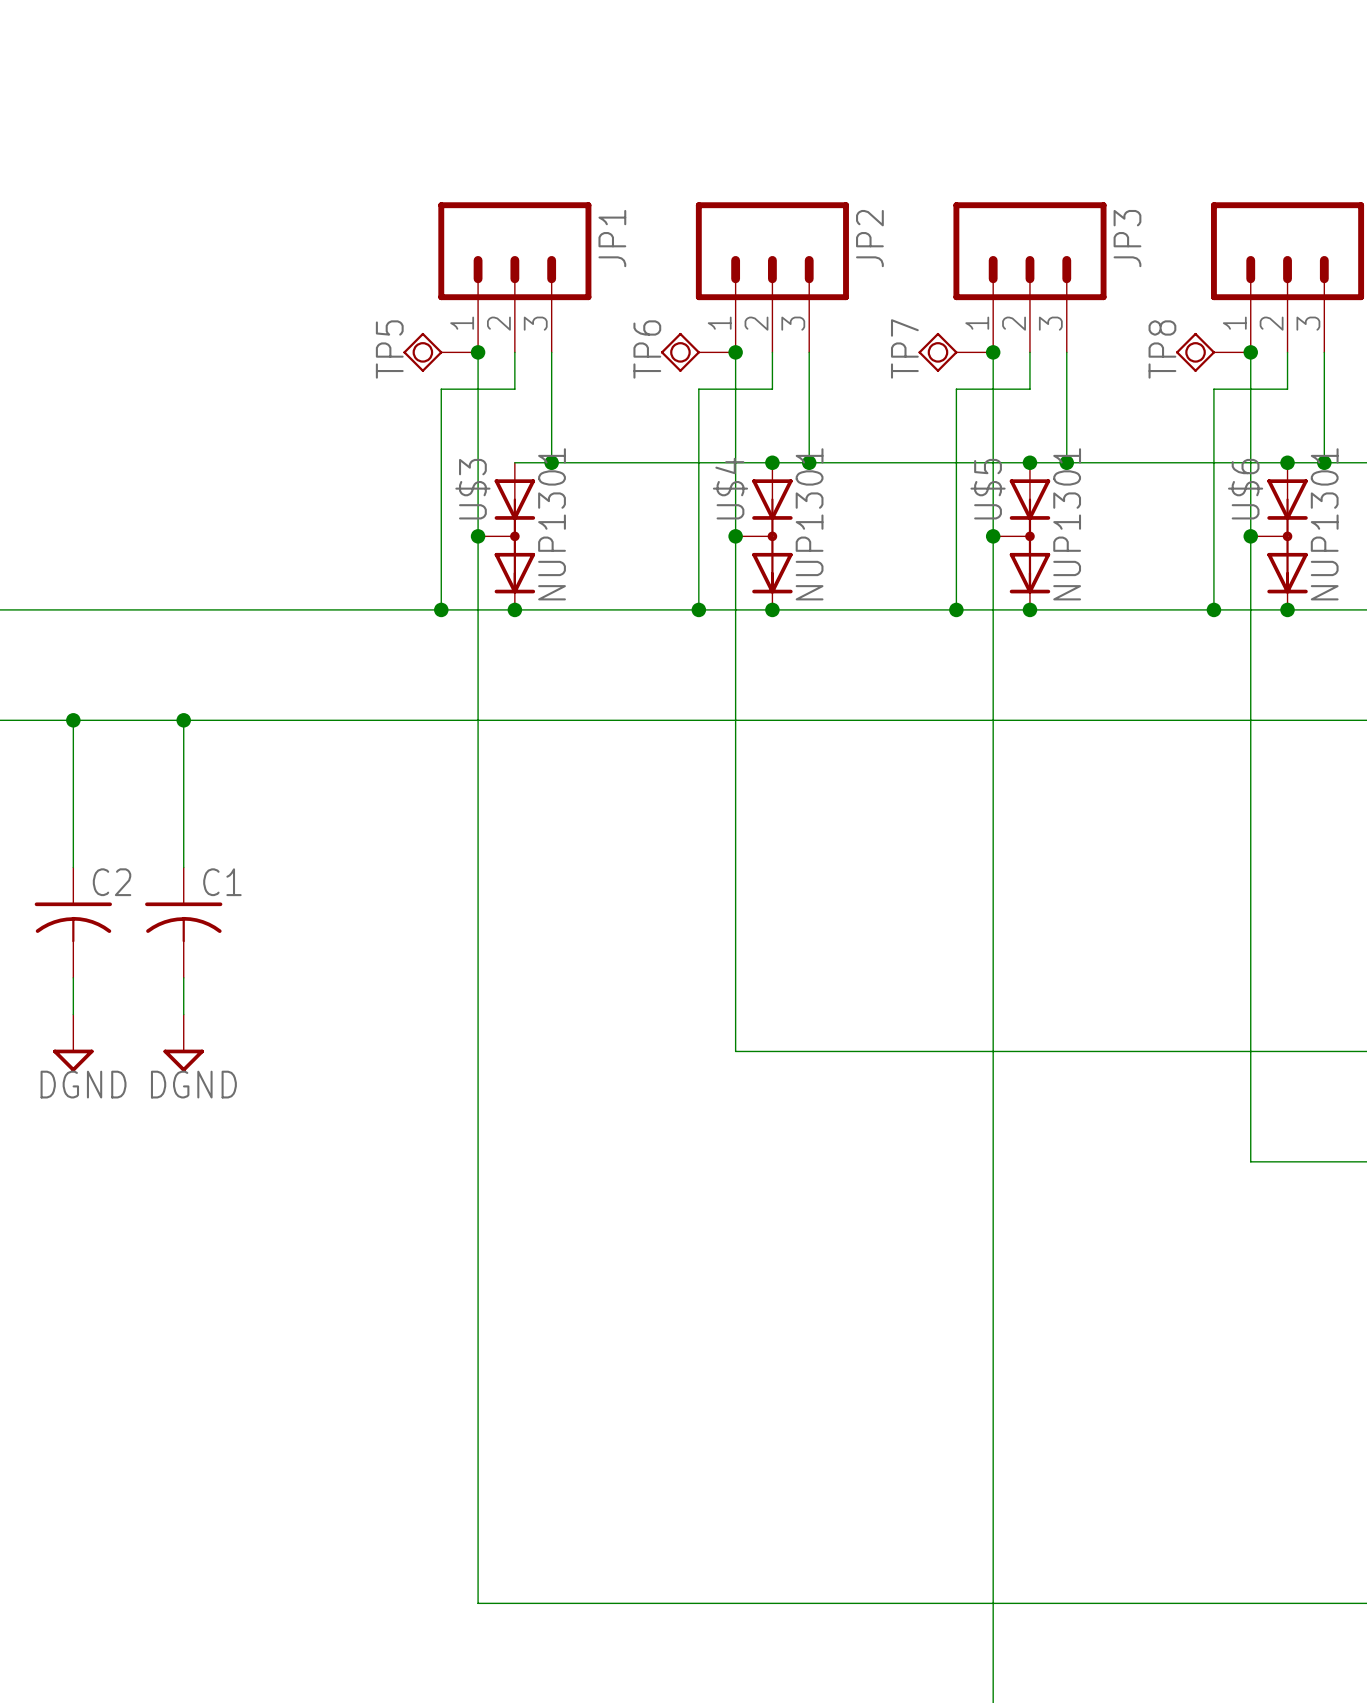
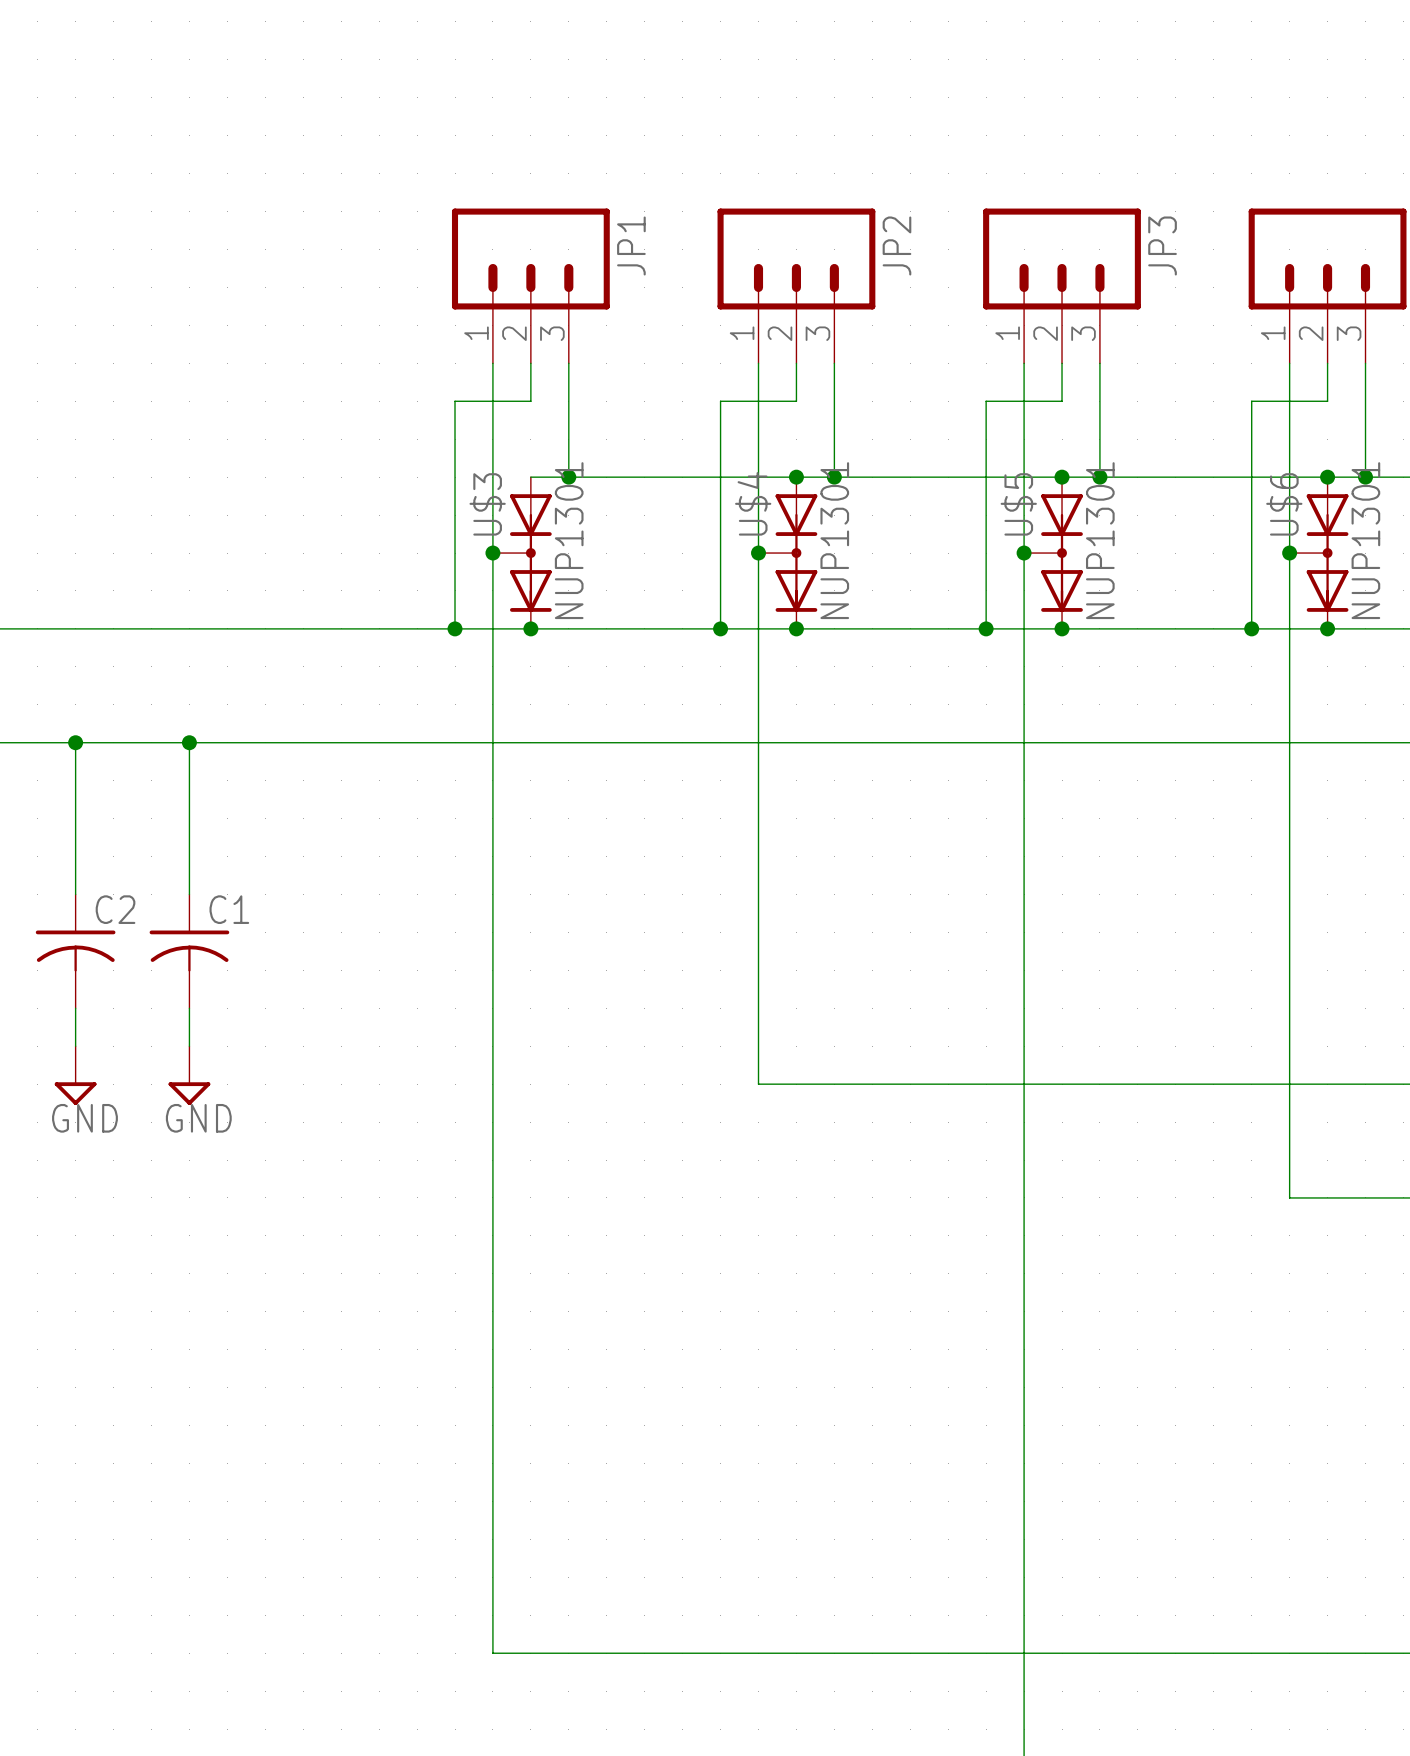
TP5: (440, 352) -> none
junction: (478, 352) -> none
TP6: (698, 352) -> none
junction: (735, 352) -> none
TP7: (955, 352) -> none
junction: (993, 352) -> none
TP8: (1213, 352) -> none
junction: (1250, 352) -> none
power symbol: DGND (73, 1043) -> GND (75, 1075)
power symbol: DGND (183, 1043) -> GND (189, 1075)

